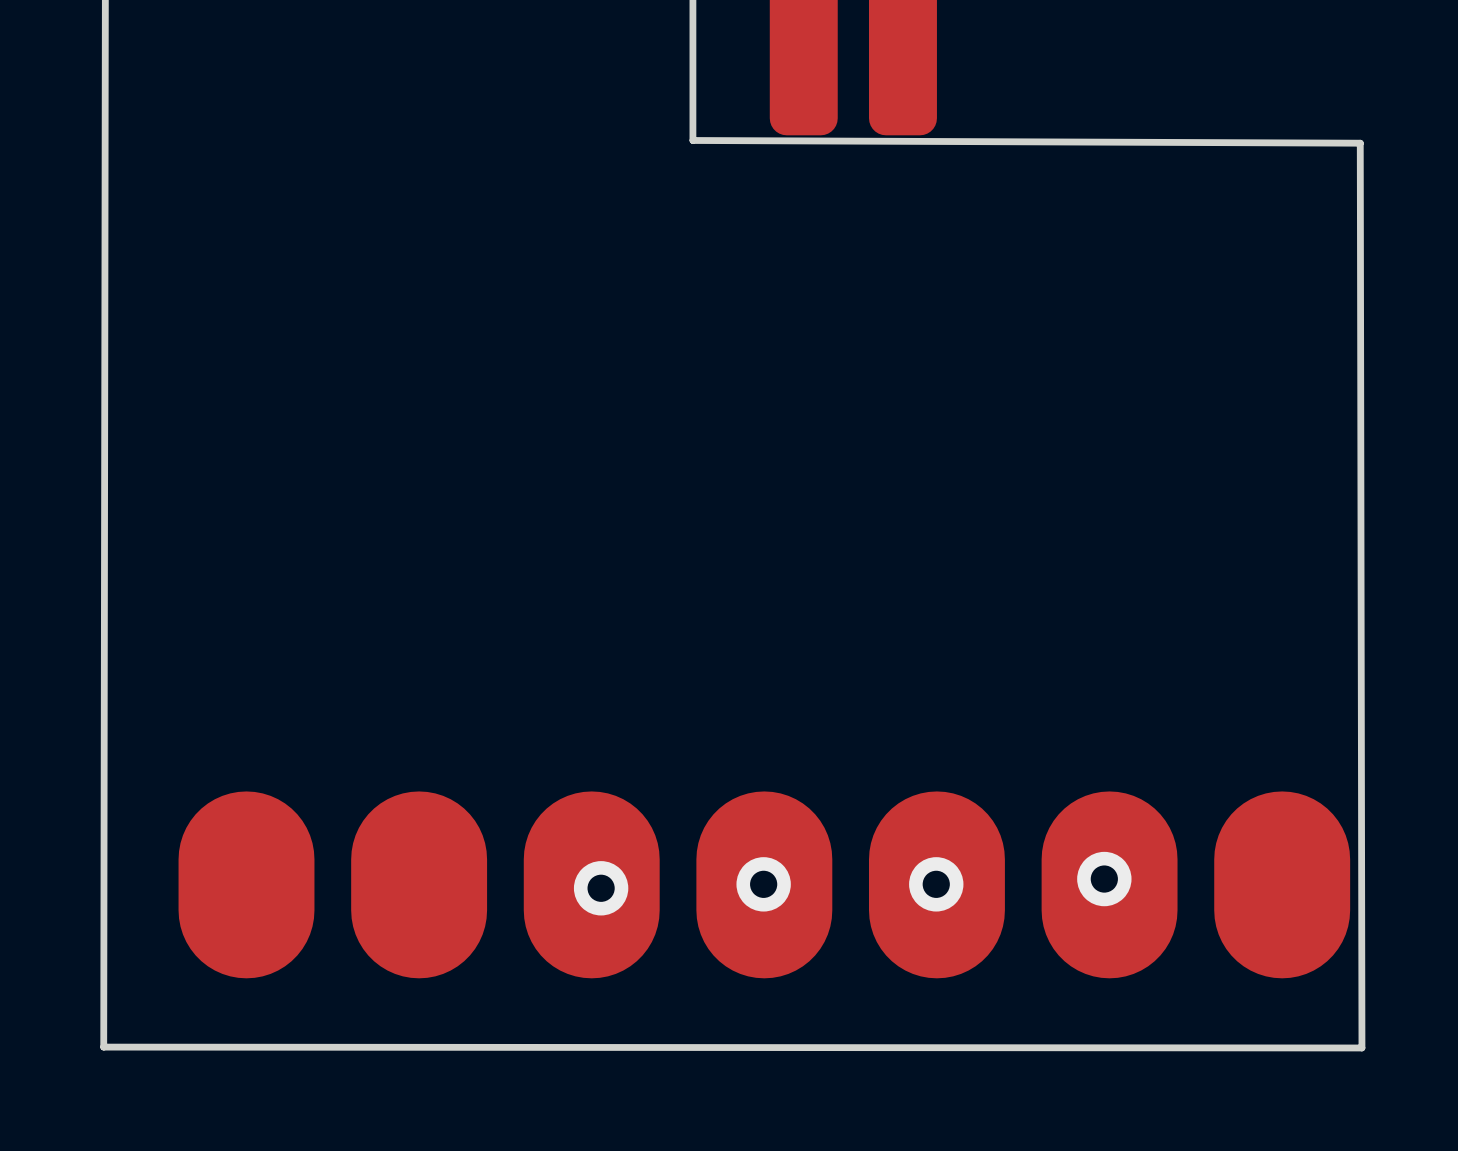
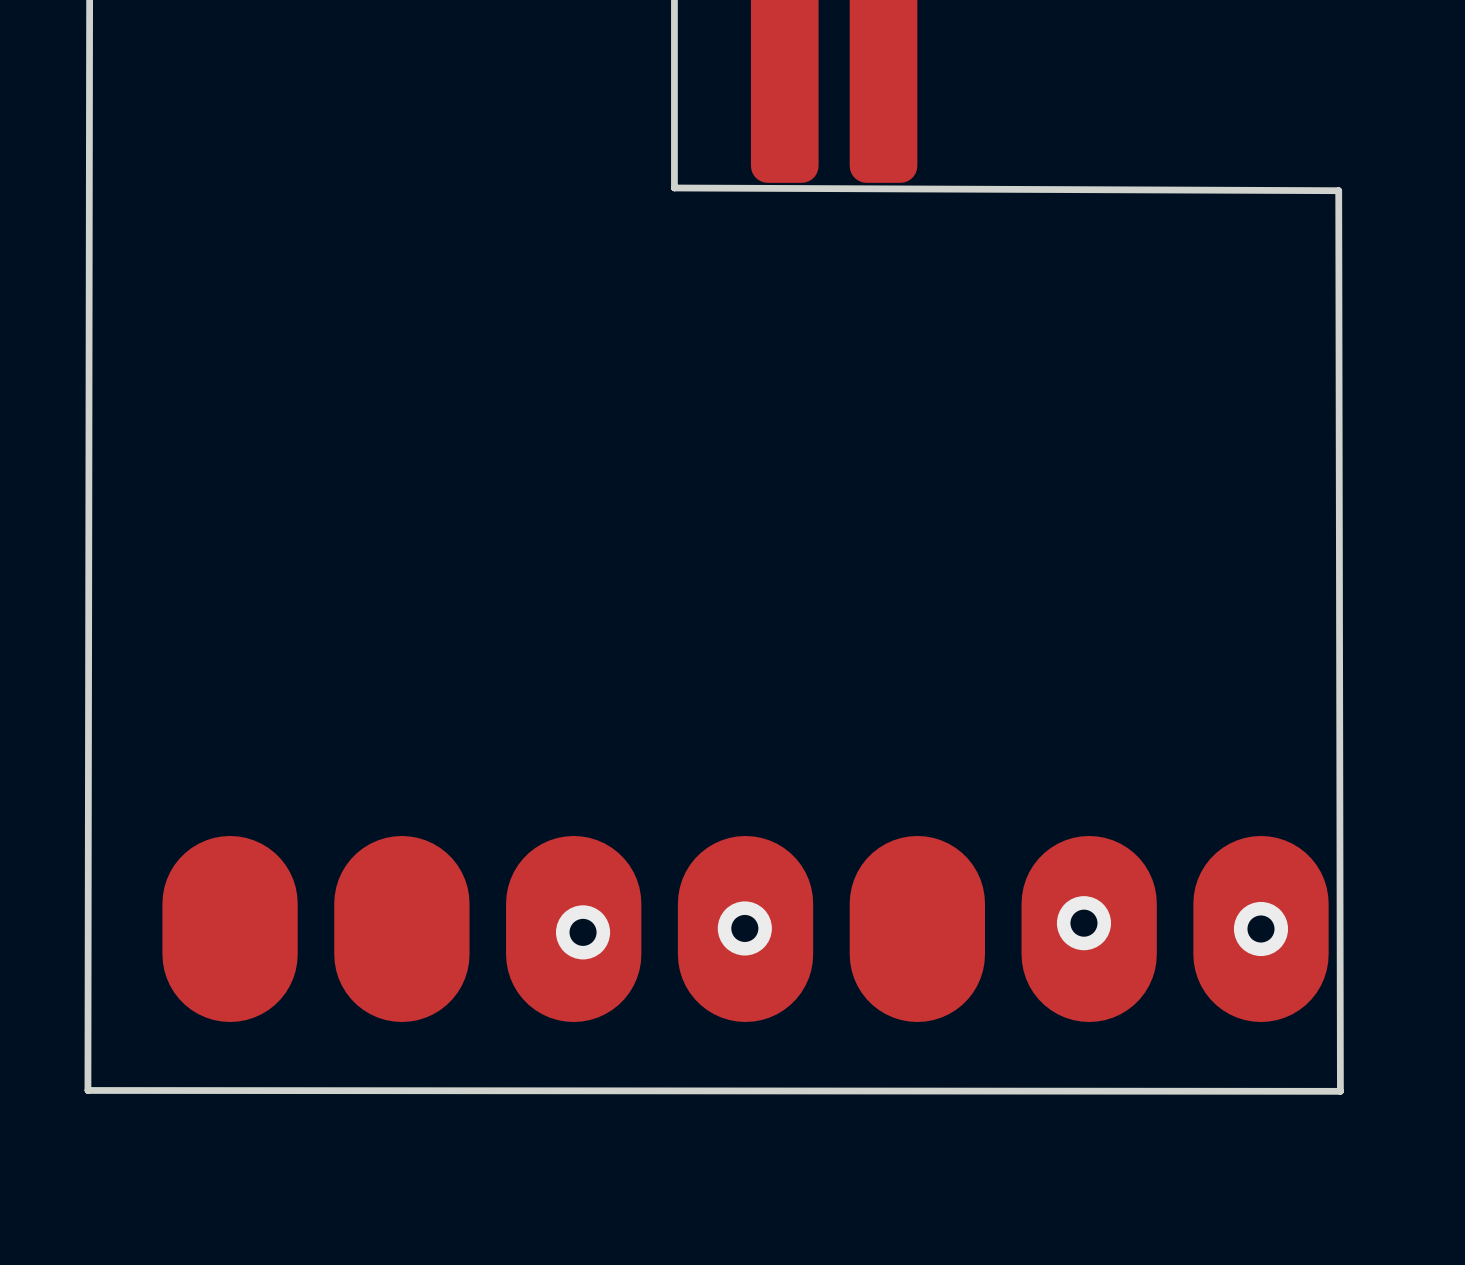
via position: (936, 884) -> (1261, 928)

